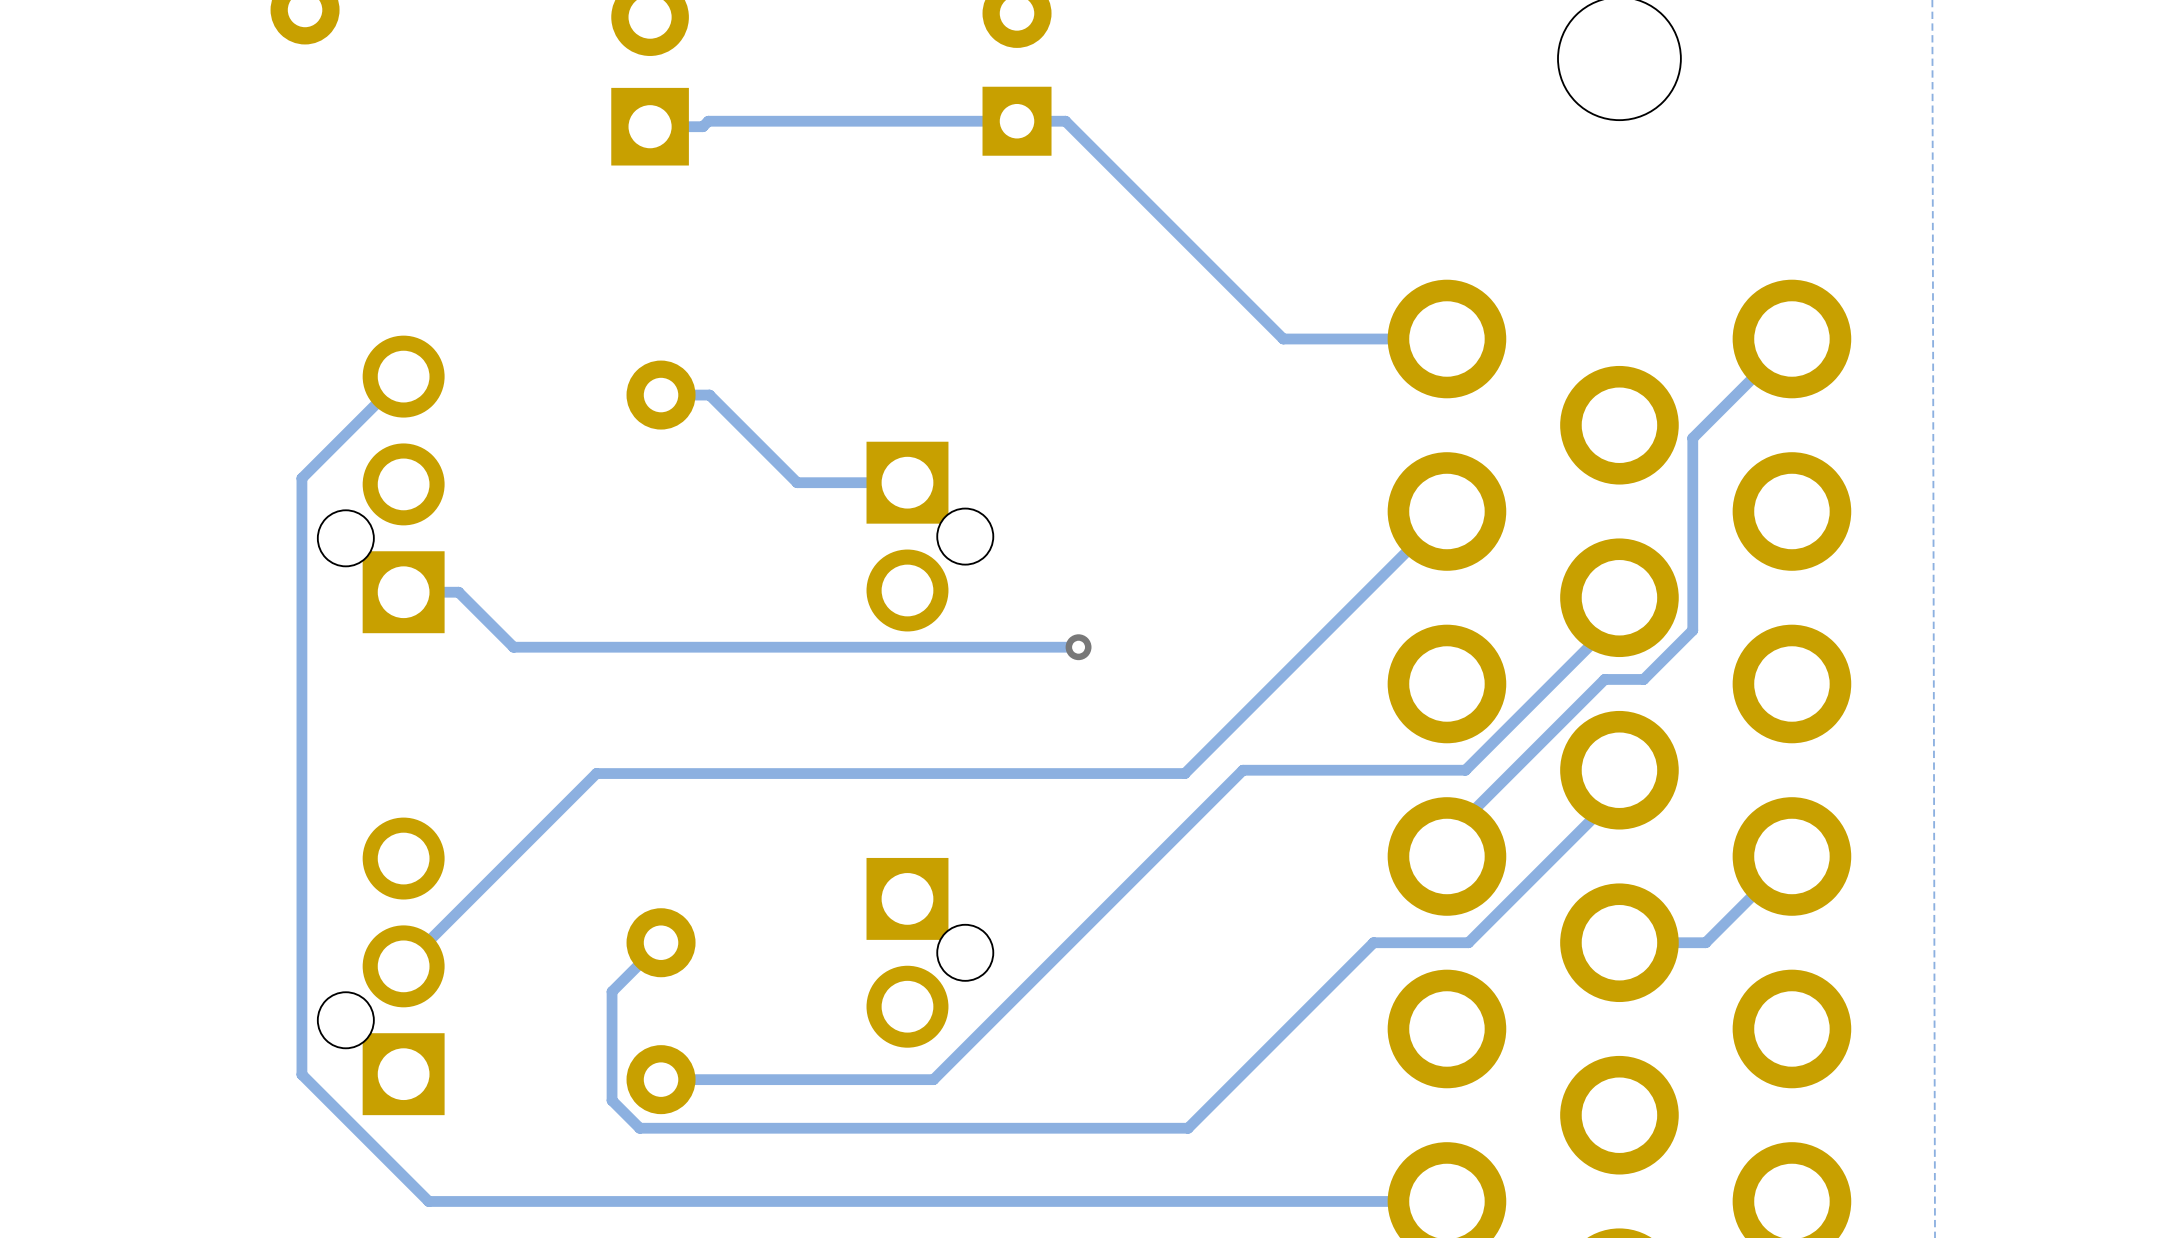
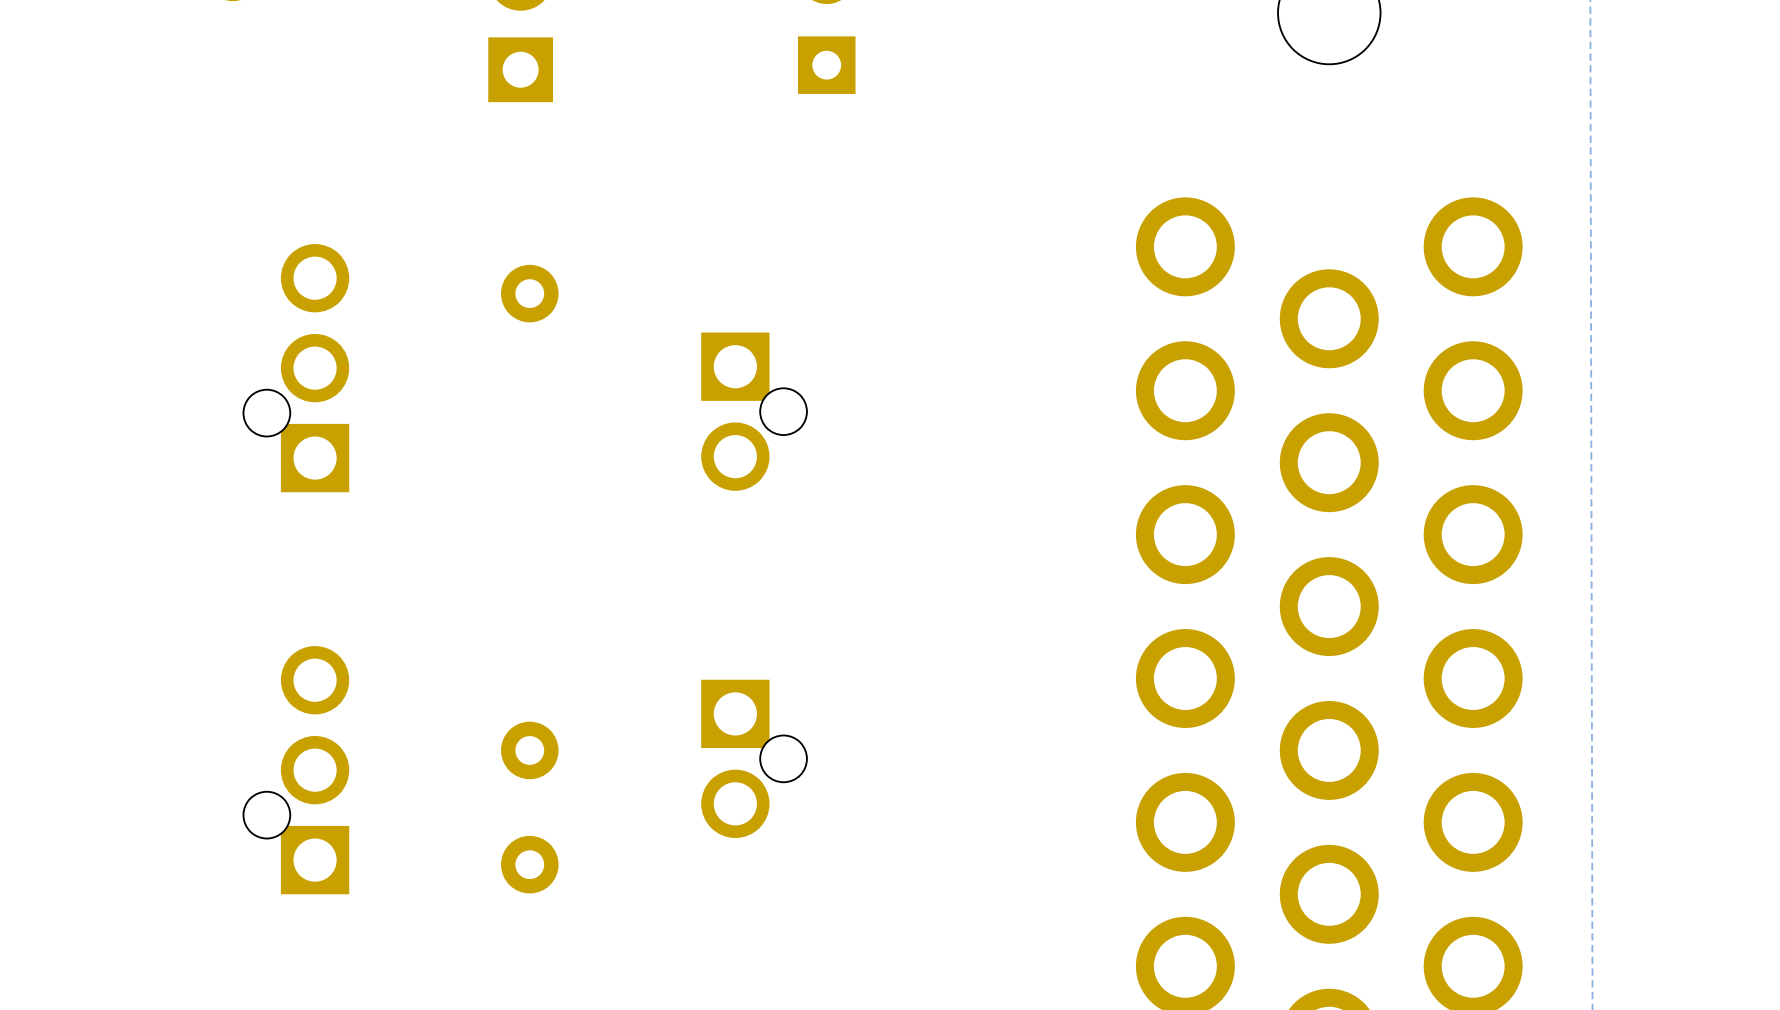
track: (650, 126) (702, 126) (708, 121) (1065, 121) (1283, 339) (1446, 339) -> none
track: (1791, 339) (1692, 438) (1692, 630) (1643, 679) (1604, 679) (1446, 837) (1446, 856) -> none
track: (403, 376) (301, 478) (301, 1074) (428, 1201) (1446, 1201) -> none
track: (661, 395) (709, 395) (797, 482) (907, 482) -> none
track: (1446, 511) (1184, 773) (596, 773) (403, 966) -> none
track: (403, 592) (458, 592) (513, 647) (1078, 647) -> none
track: (1619, 597) (1619, 616) (1465, 770) (1242, 770) (933, 1079) (661, 1079) -> none
via: (1078, 647) -> none
track: (1619, 770) (1619, 791) (1468, 942) (1373, 942) (1188, 1128) (639, 1128) (612, 1100) (612, 991) (661, 942) -> none
track: (1791, 856) (1705, 942) (1619, 942) -> none

